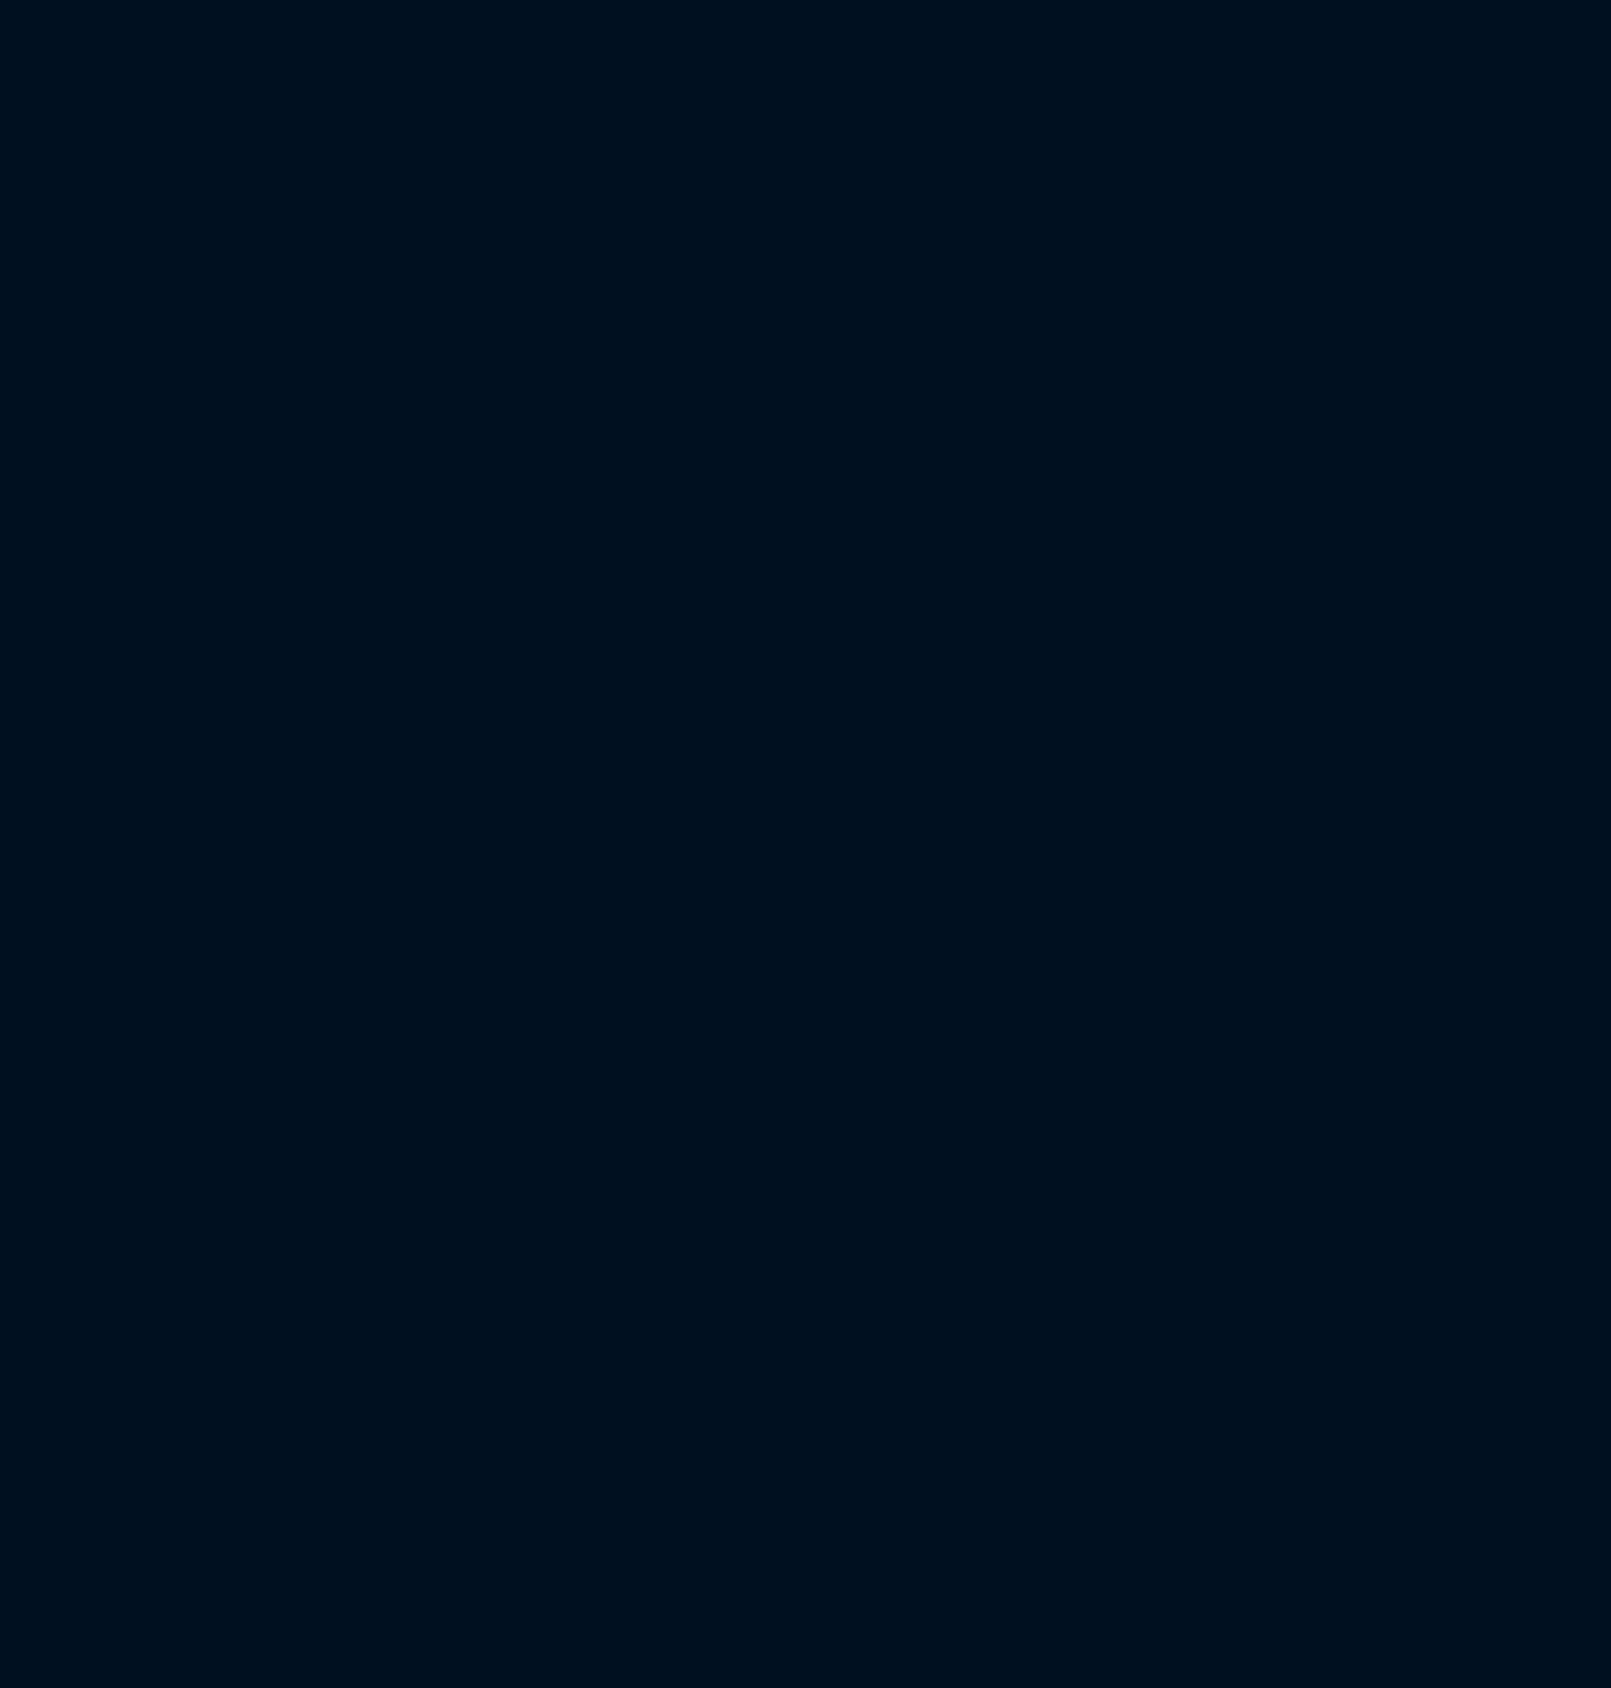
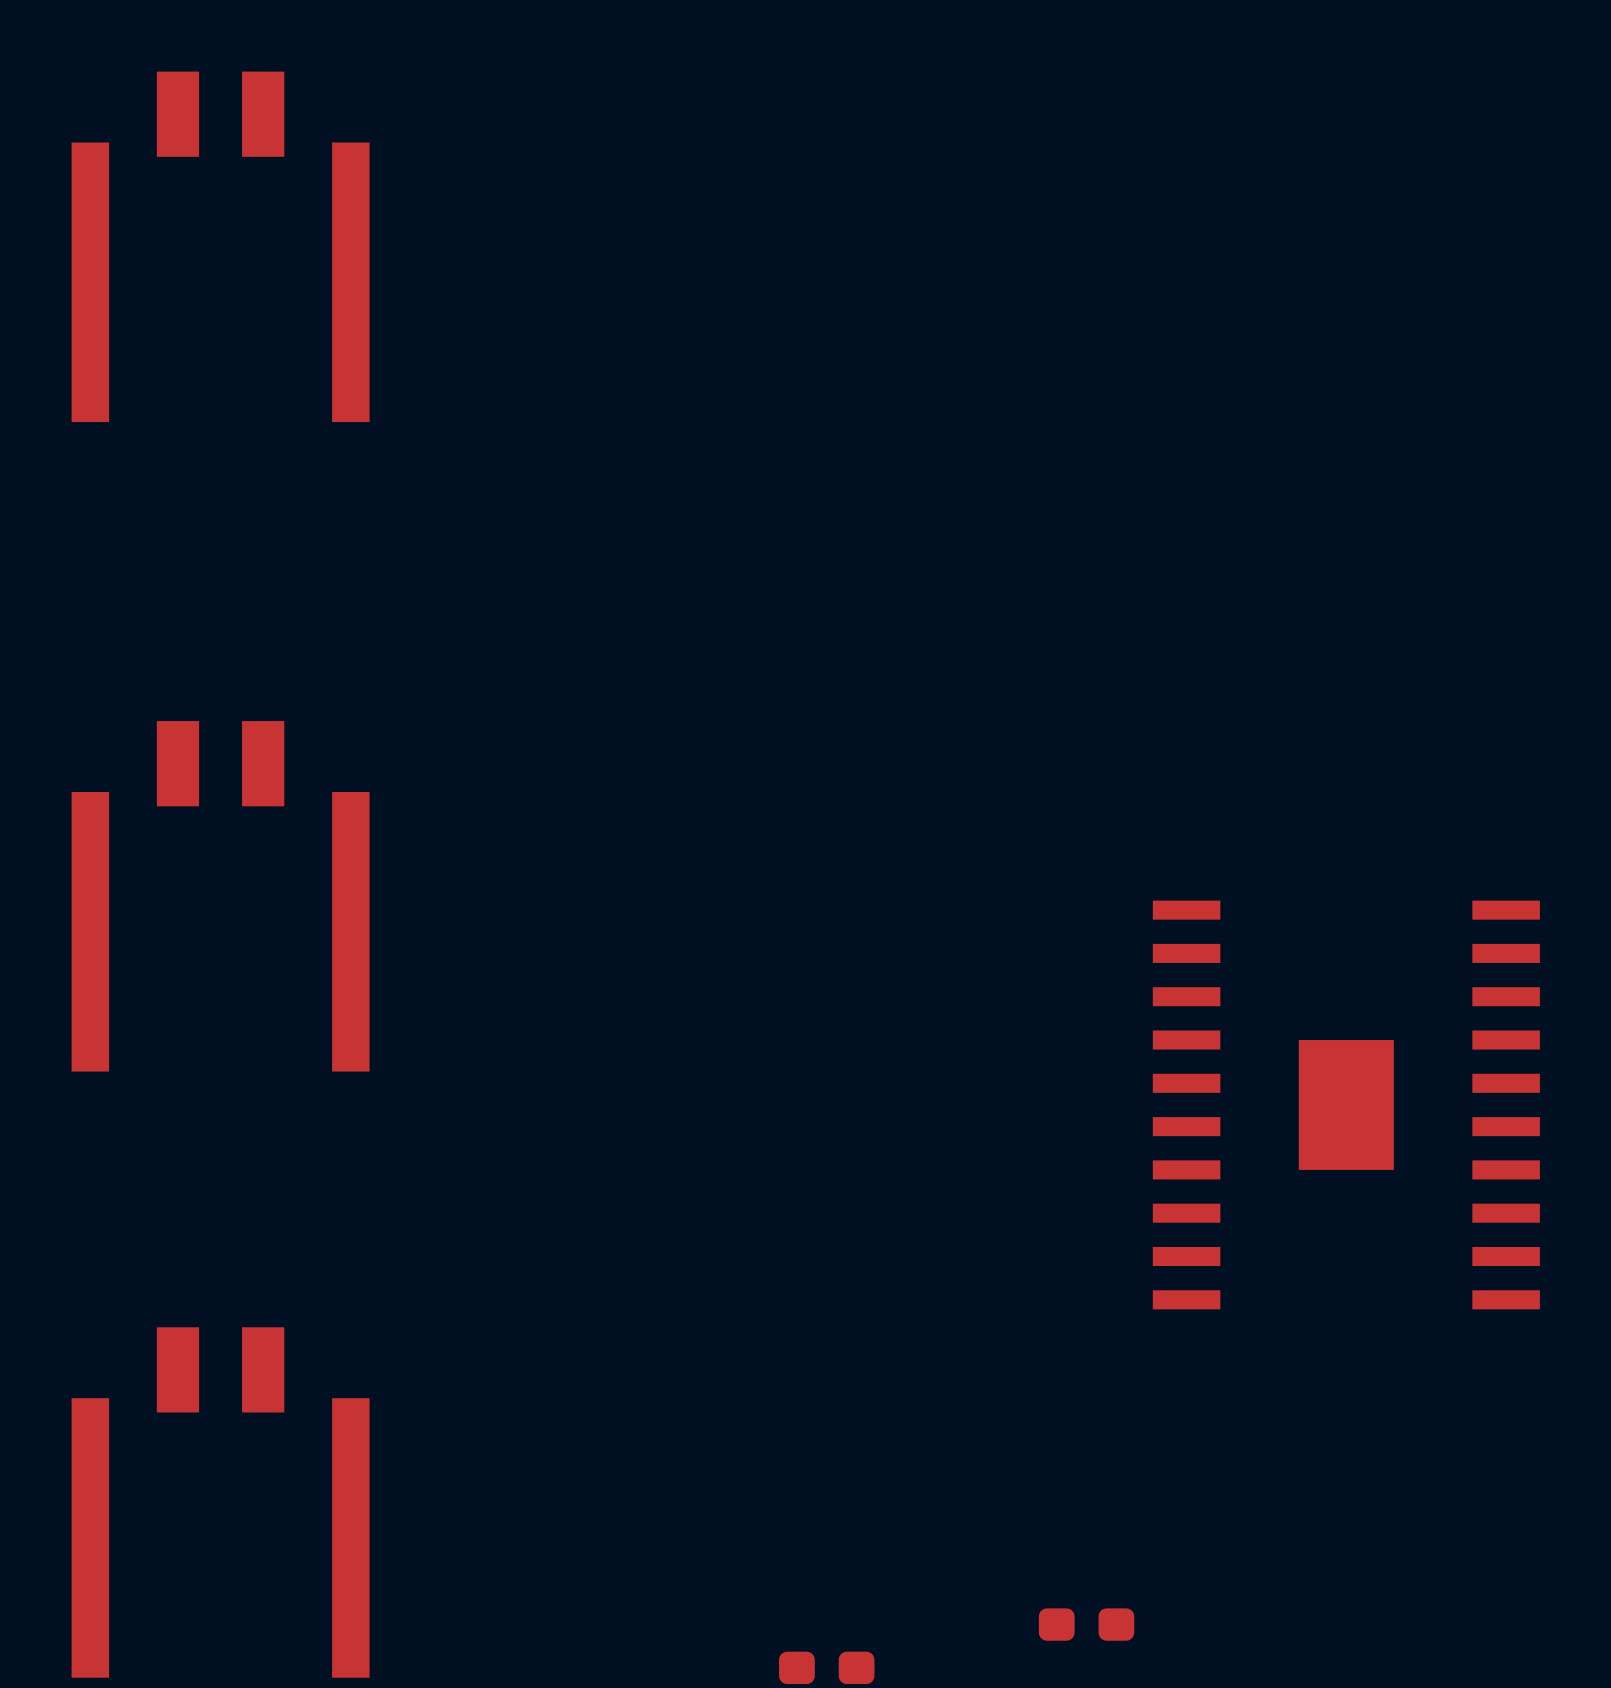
part: none -> (220, 246)
part: none -> (220, 896)
part: none -> (1346, 1104)
part: none -> (220, 1502)
part: none -> (1086, 1624)
part: none -> (826, 1667)

